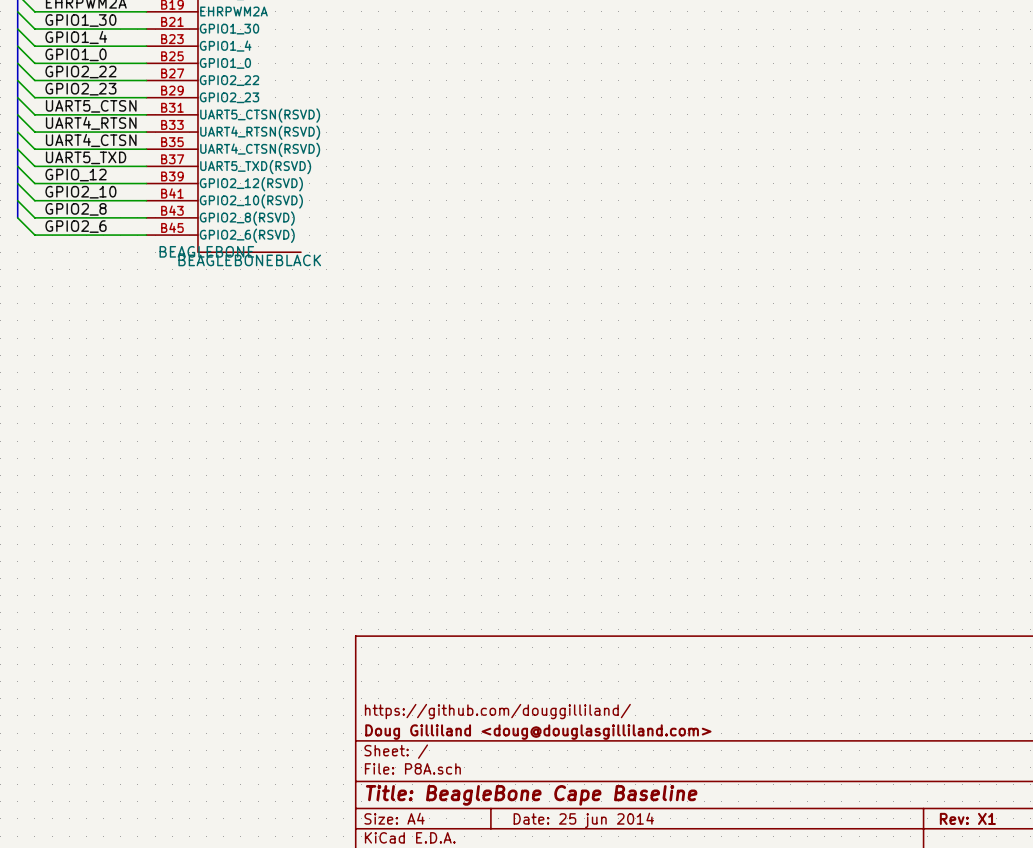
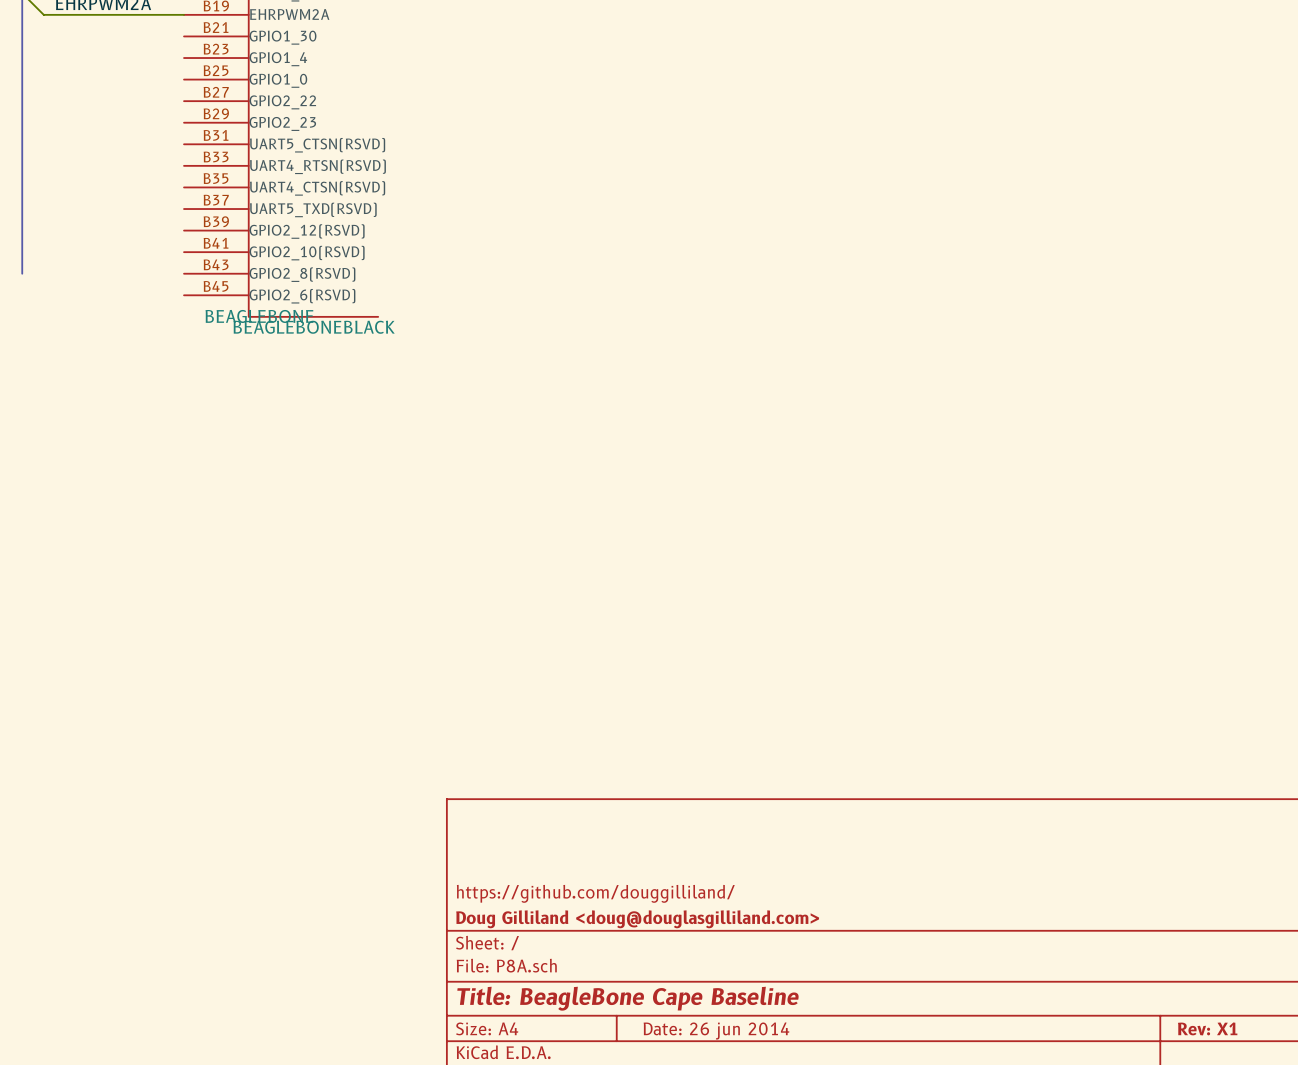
wire: (17, 11) (34, 29) (146, 29) -> none
label: GPIO1_30 (80, 20) -> none
wire: (17, 29) (34, 46) (146, 46) -> none
label: GPIO1_4 (76, 37) -> none
wire: (17, 46) (34, 63) (146, 63) -> none
label: GPIO1_0 (76, 54) -> none
wire: (17, 63) (34, 80) (146, 80) -> none
label: GPIO2_22 (80, 72) -> none
wire: (17, 80) (34, 97) (146, 97) -> none
label: GPIO2_23 (80, 89) -> none
wire: (17, 97) (34, 114) (146, 114) -> none
label: UART5_CTSN (91, 106) -> none
wire: (17, 114) (34, 132) (146, 132) -> none
label: UART4_RTSN (91, 123) -> none
wire: (17, 132) (34, 149) (146, 149) -> none
label: UART4_CTSN (91, 140) -> none
wire: (17, 149) (34, 166) (146, 166) -> none
label: UART5_TXD (86, 157) -> none
wire: (17, 166) (34, 183) (146, 183) -> none
label: GPIO_12 (76, 175) -> none
wire: (17, 183) (34, 200) (146, 200) -> none
label: GPIO2_10 (80, 192) -> none
wire: (17, 200) (34, 217) (146, 217) -> none
label: GPIO2_8 (76, 209) -> none
wire: (17, 217) (34, 235) (146, 235) -> none
label: GPIO2_6 (76, 226) -> none
title block: Date: 25 jun 2014 (583, 820) -> Date: 26 jun 2014 (716, 1031)

